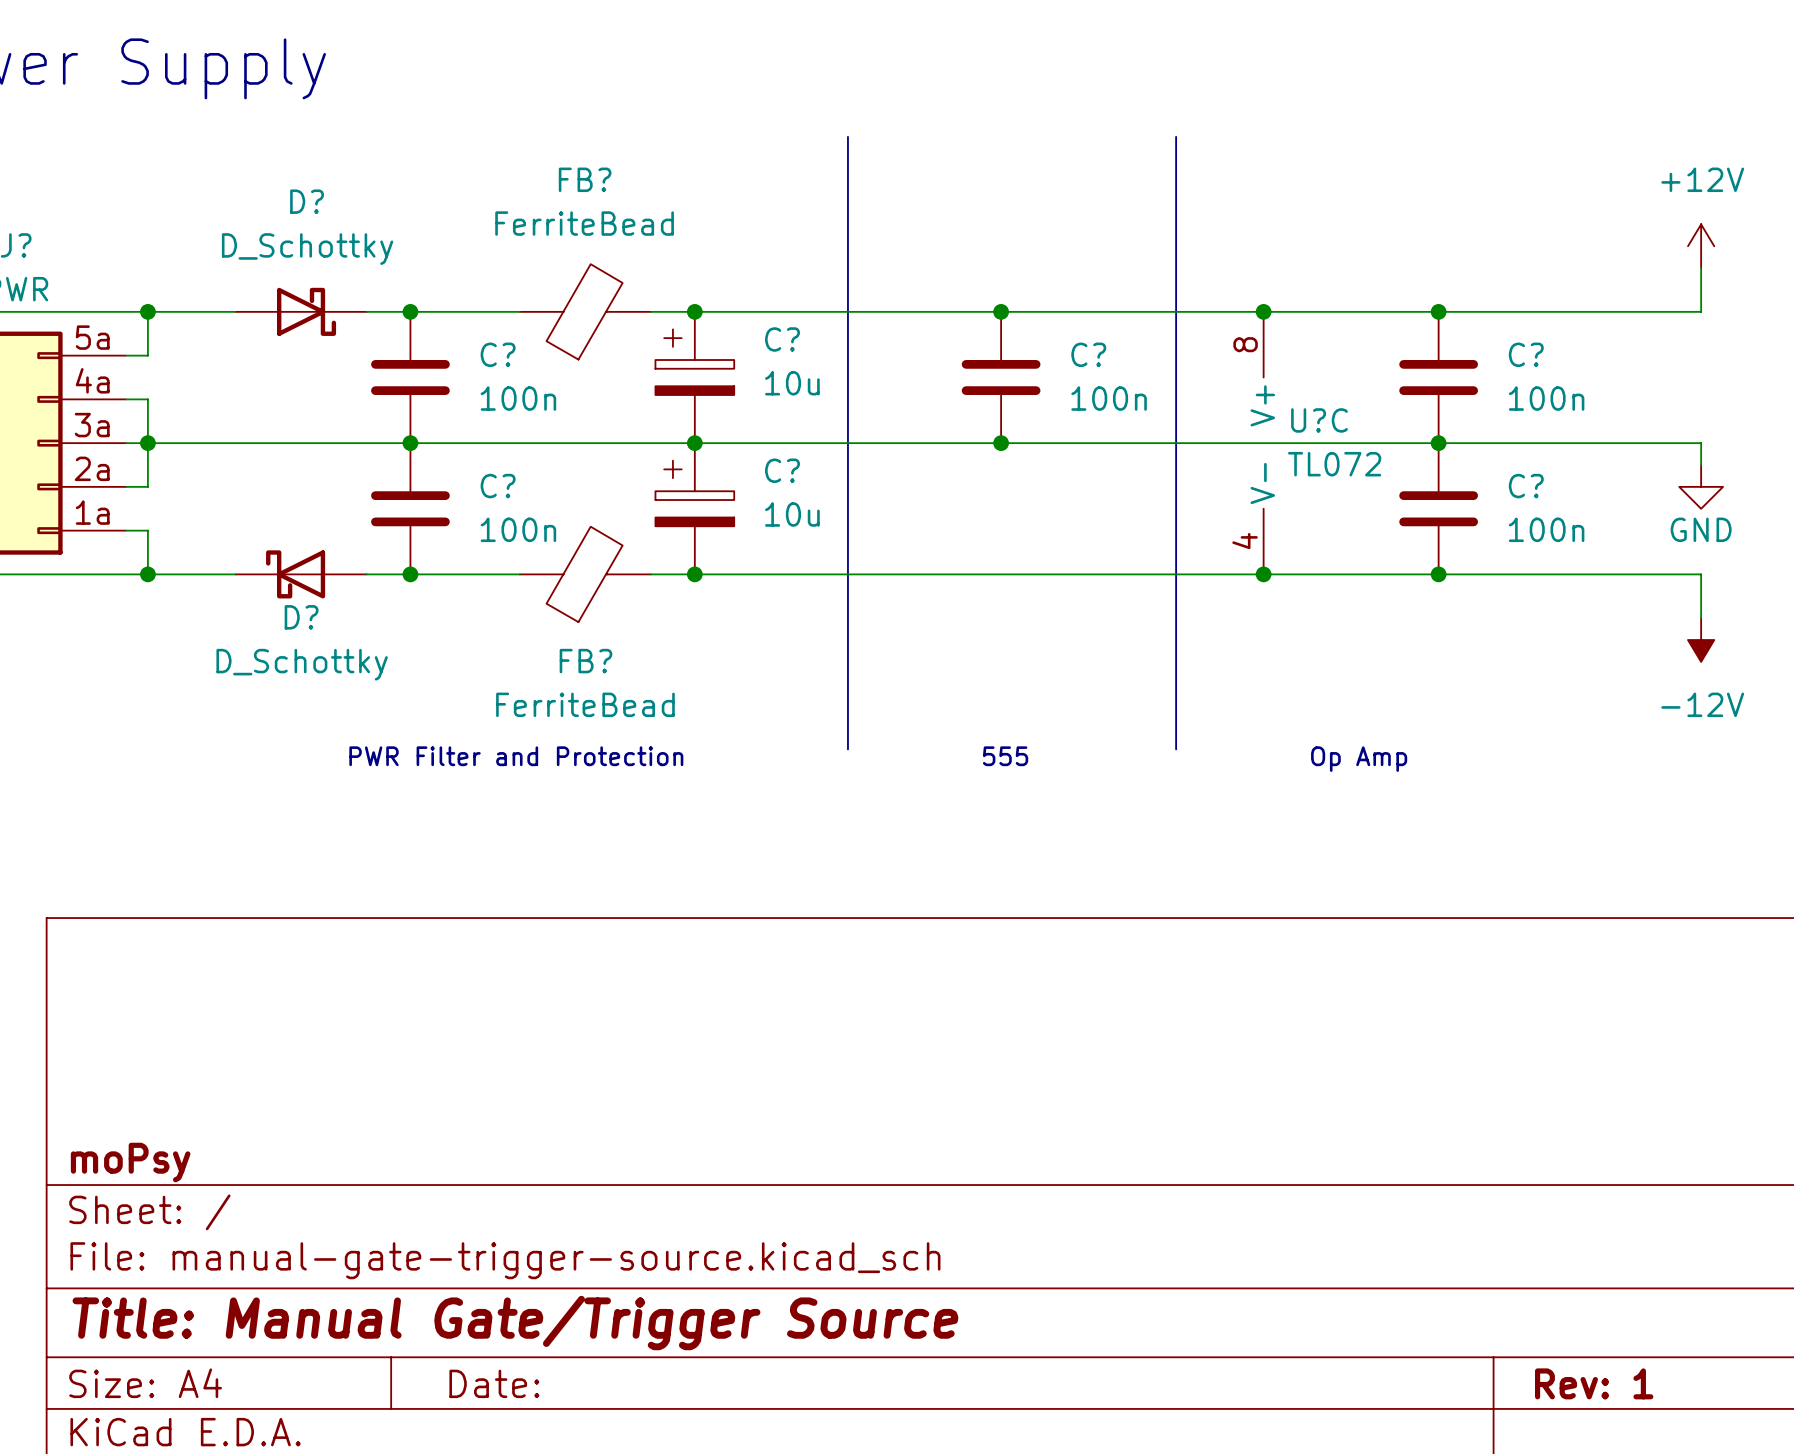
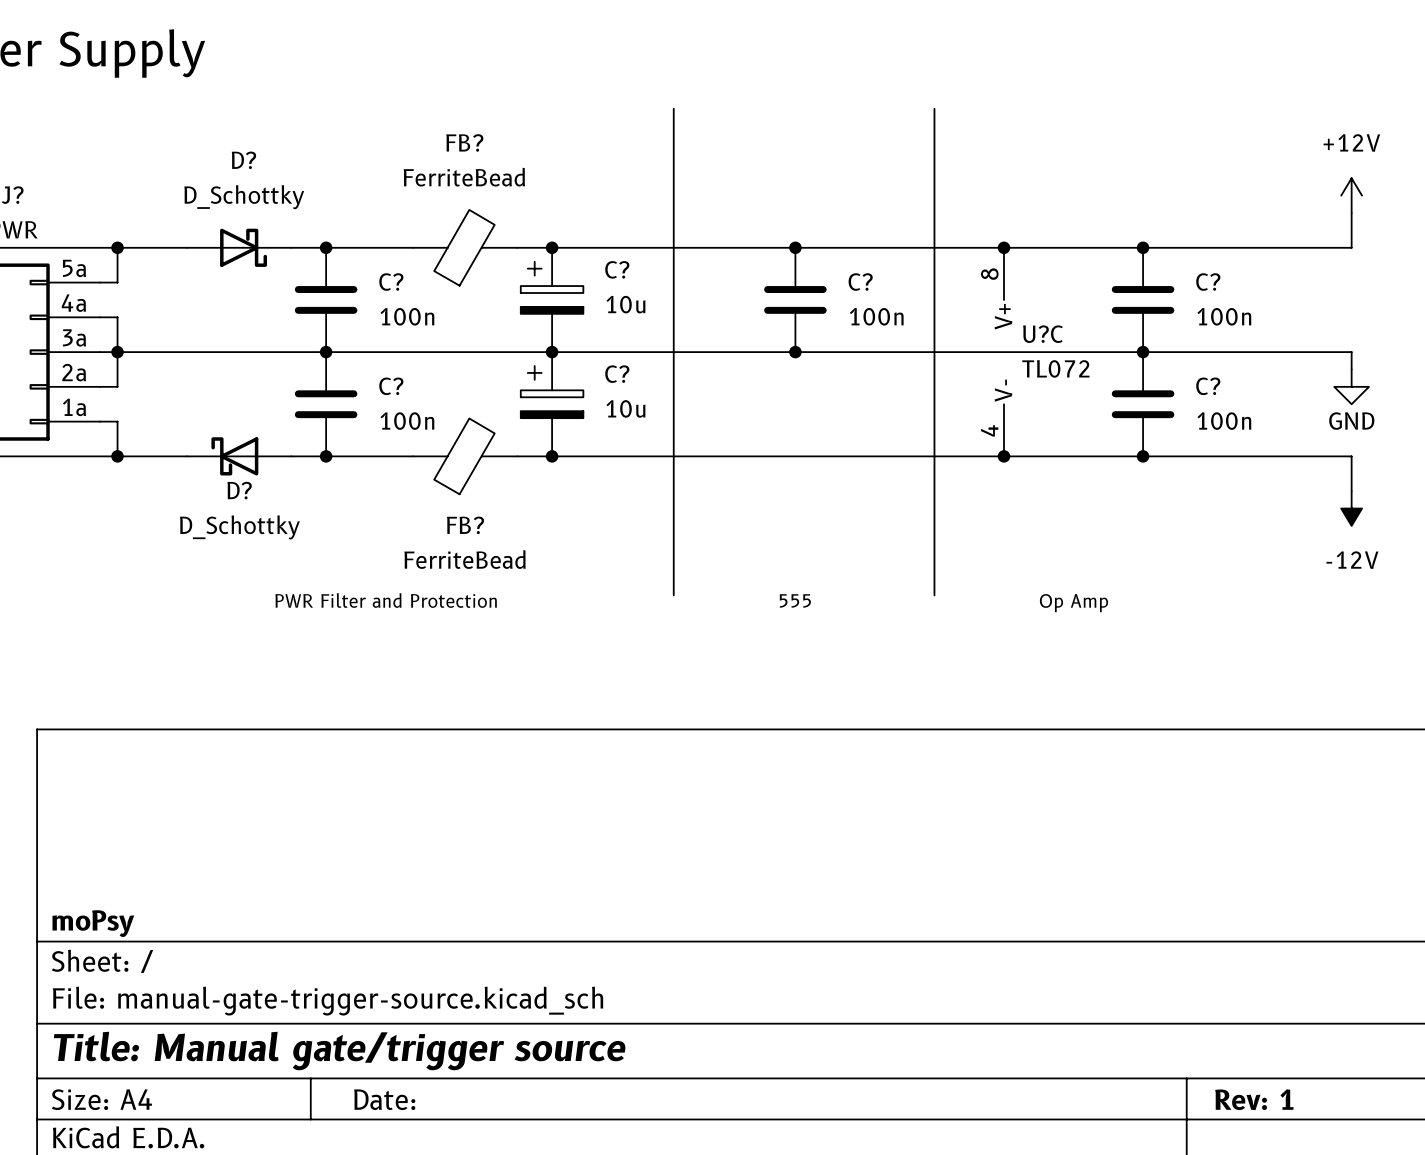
title block: Title: Manual Gate/Trigger Source (515, 1323) -> Title: Manual gate/trigger source (339, 1050)

